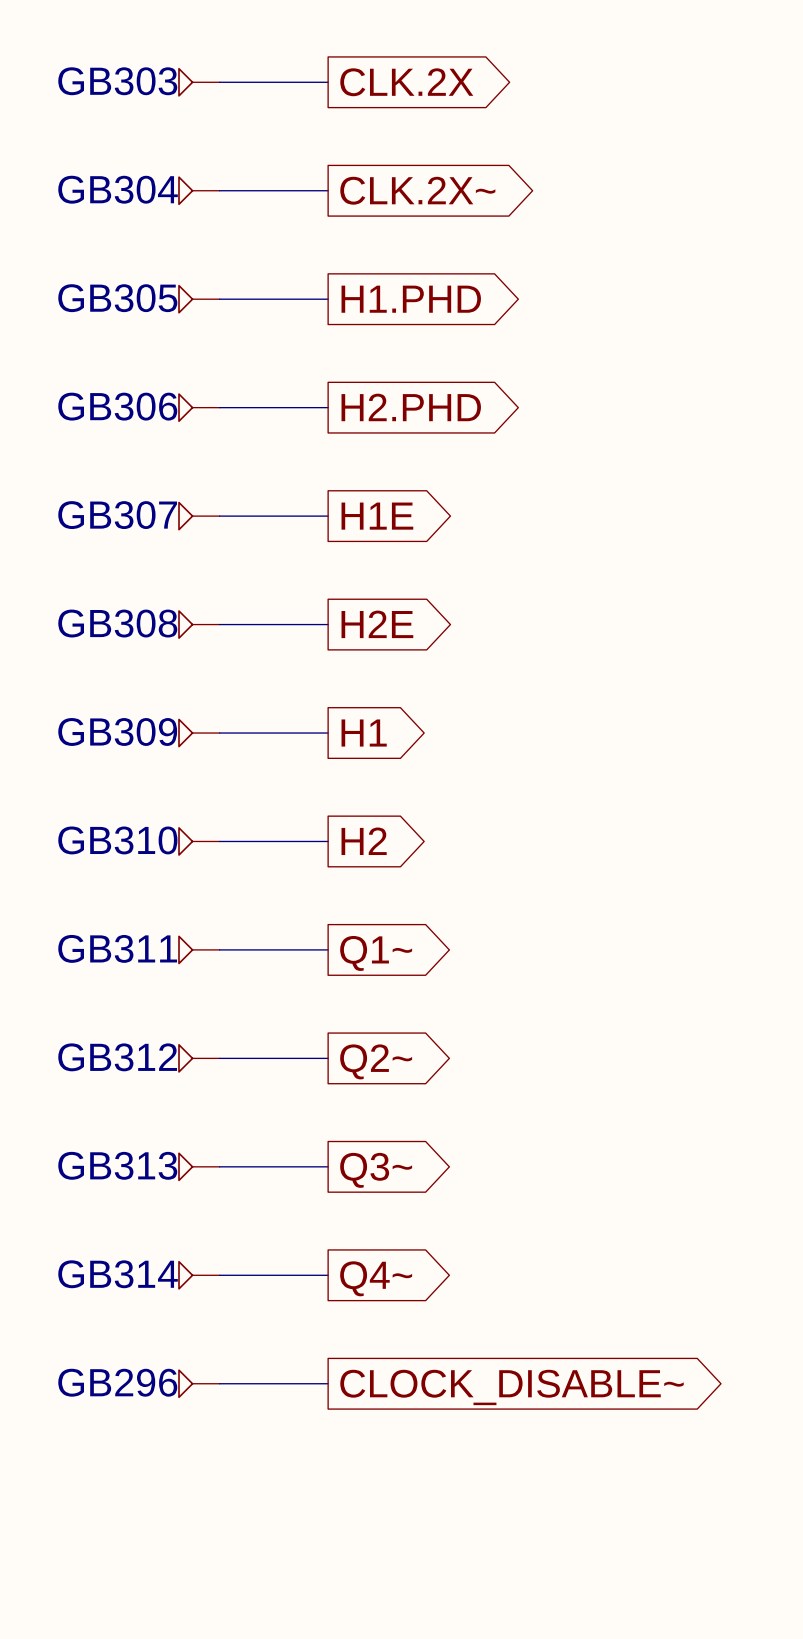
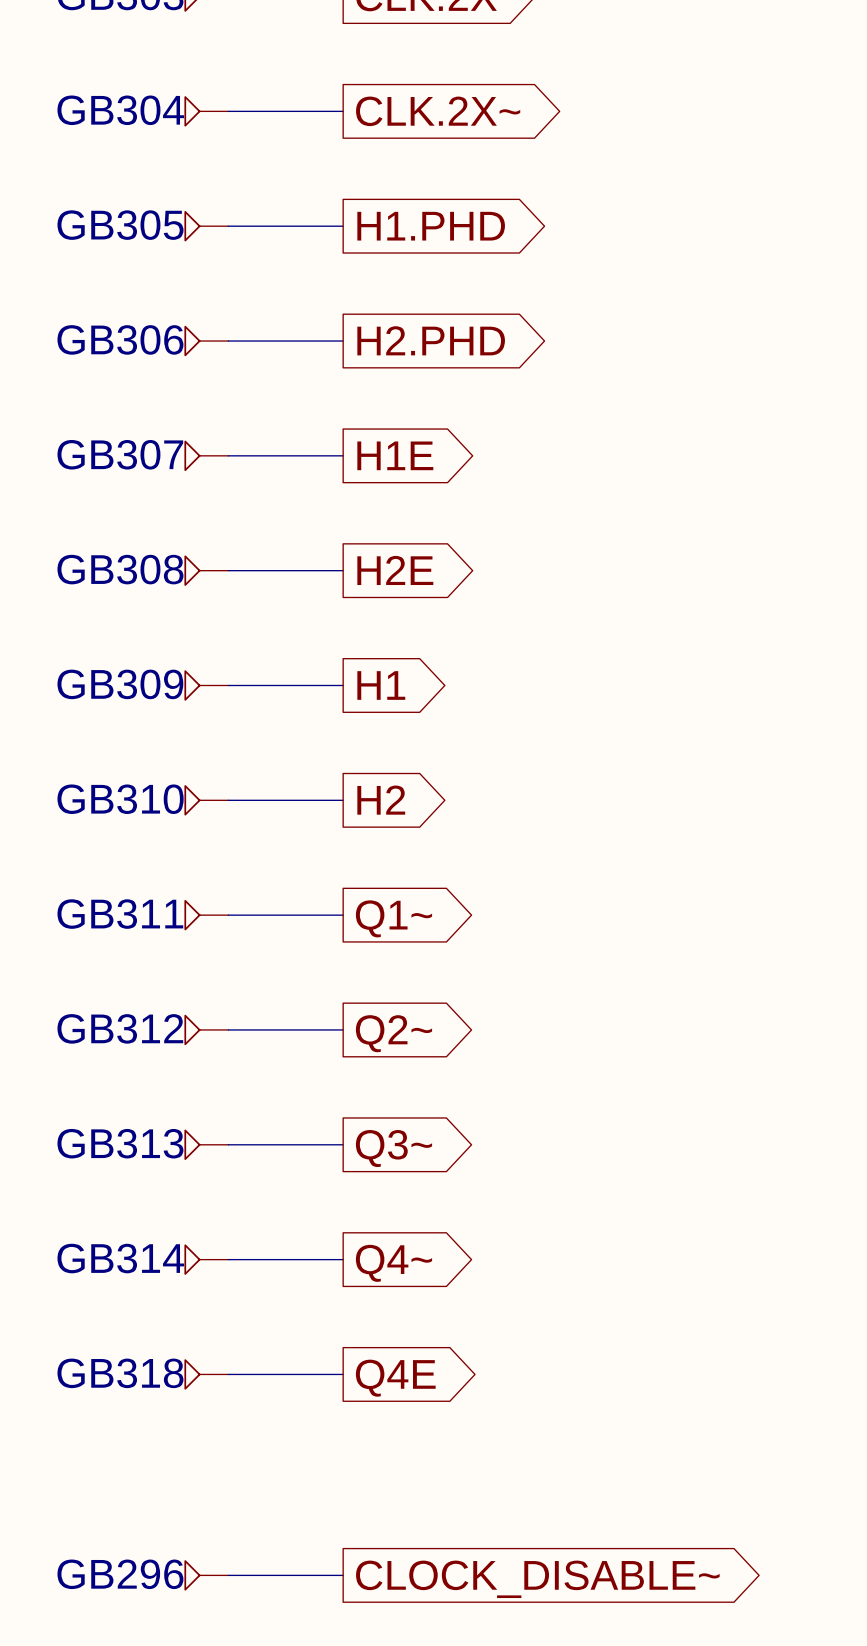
GB296 name: GB296 (117, 1382) -> GB318 (120, 1373)
global label: CLOCK_DISABLE~ (512, 1387) -> Q4E (395, 1378)
GB296: none -> (206, 1575)
wire: none -> (228, 1575) (343, 1575)
global label: none -> CLOCK_DISABLE~ (537, 1579)

